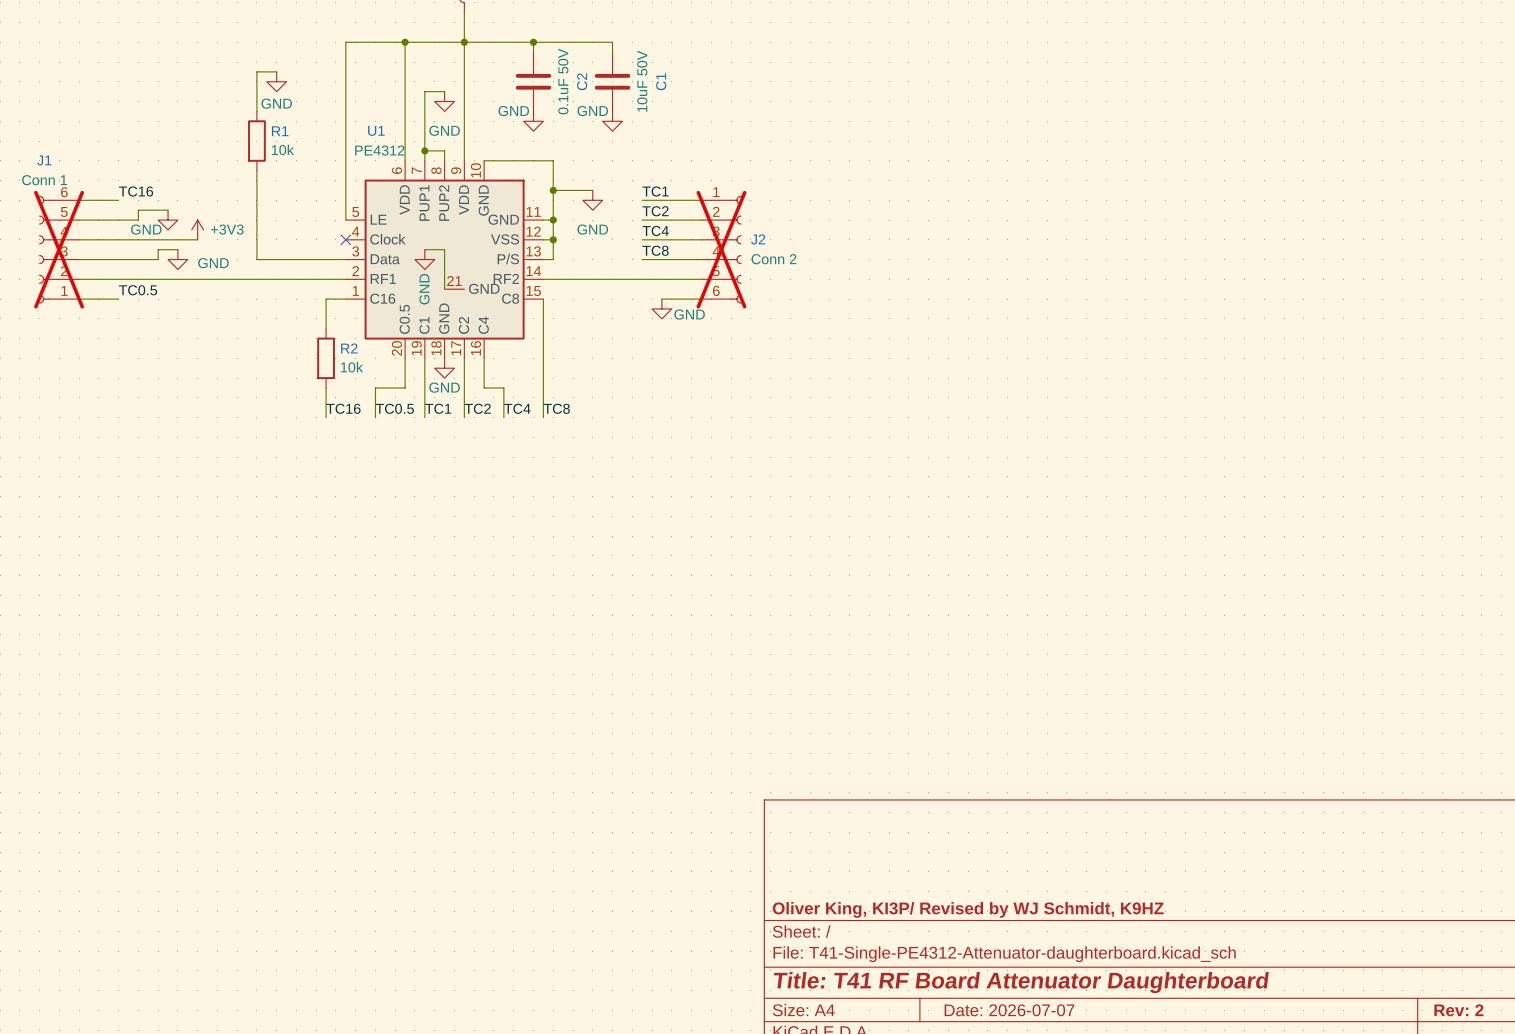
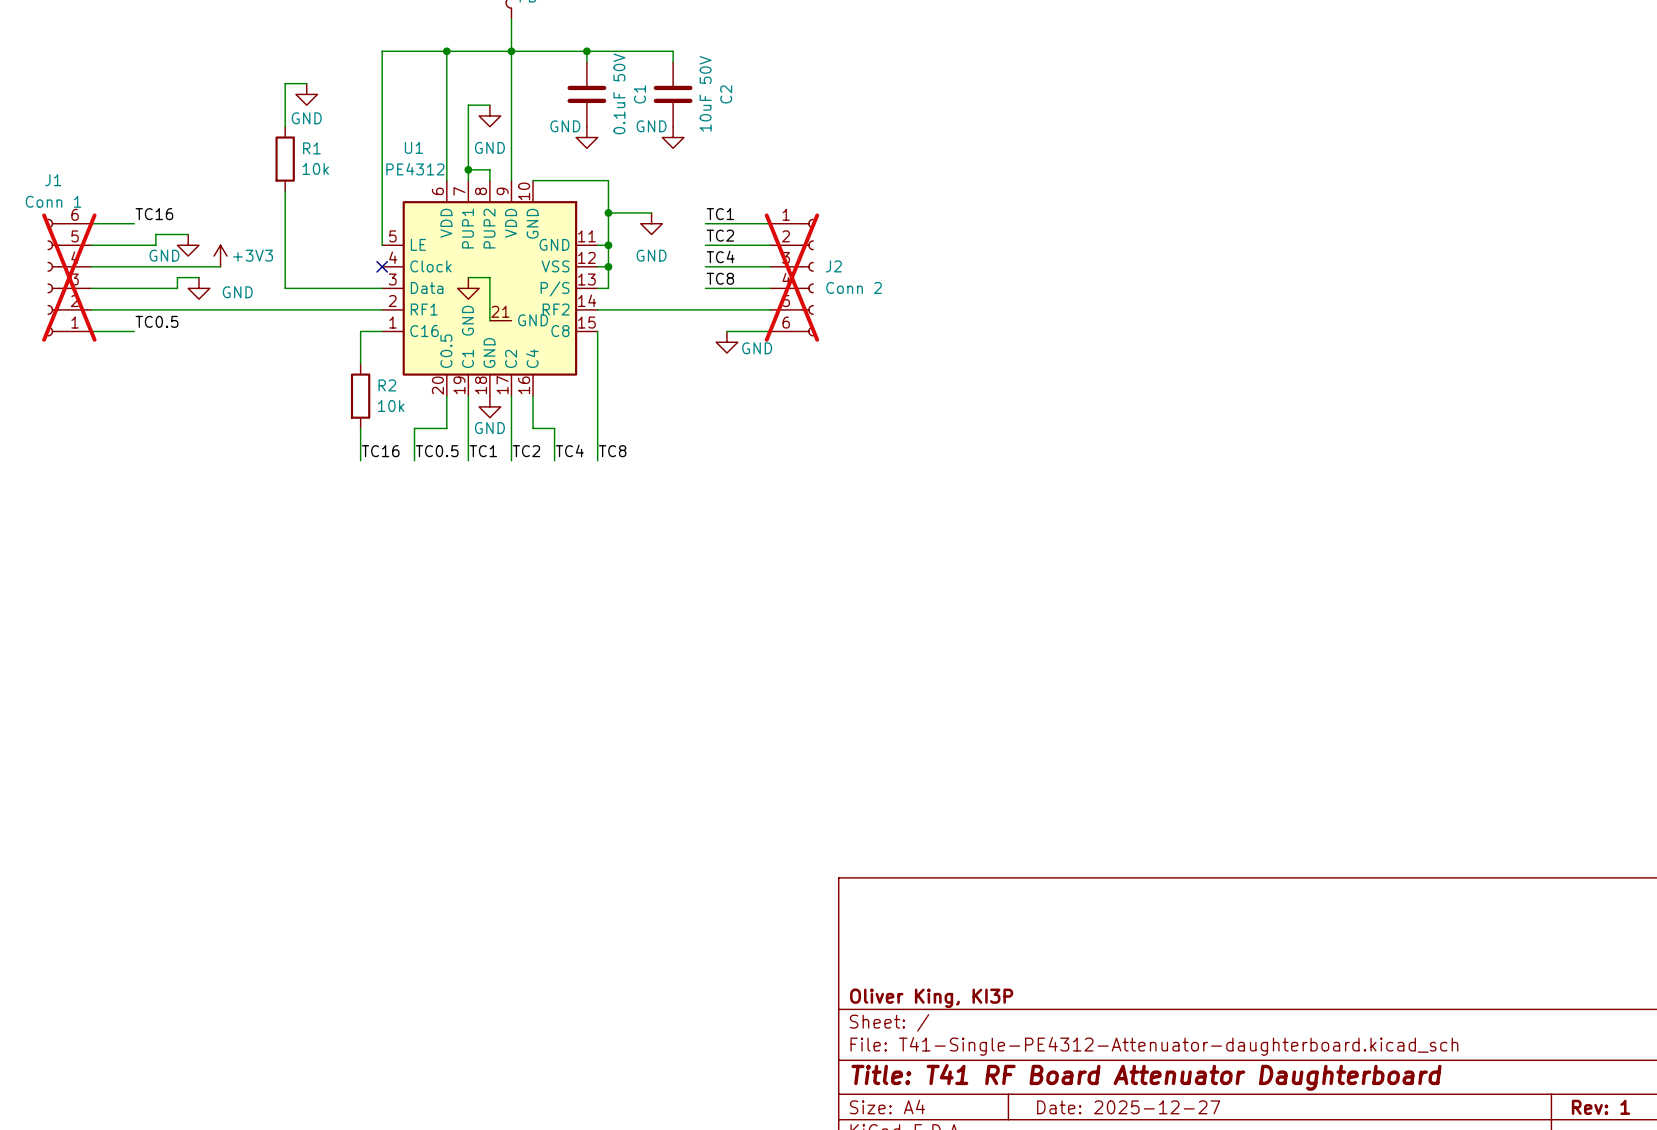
C2 name: C2 (582, 81) -> C1 (639, 94)
C1 name: C1 (661, 81) -> C2 (726, 94)
title block: Oliver King, KI3P/ Revised by WJ Schmidt, K9HZ (968, 909) -> Oliver King, KI3P (931, 998)
title block: Date: 2026-07-07 (1009, 1010) -> Date: 2025-12-27 (1128, 1107)
title block: Rev: 2 (1458, 1010) -> Rev: 1 (1600, 1107)

